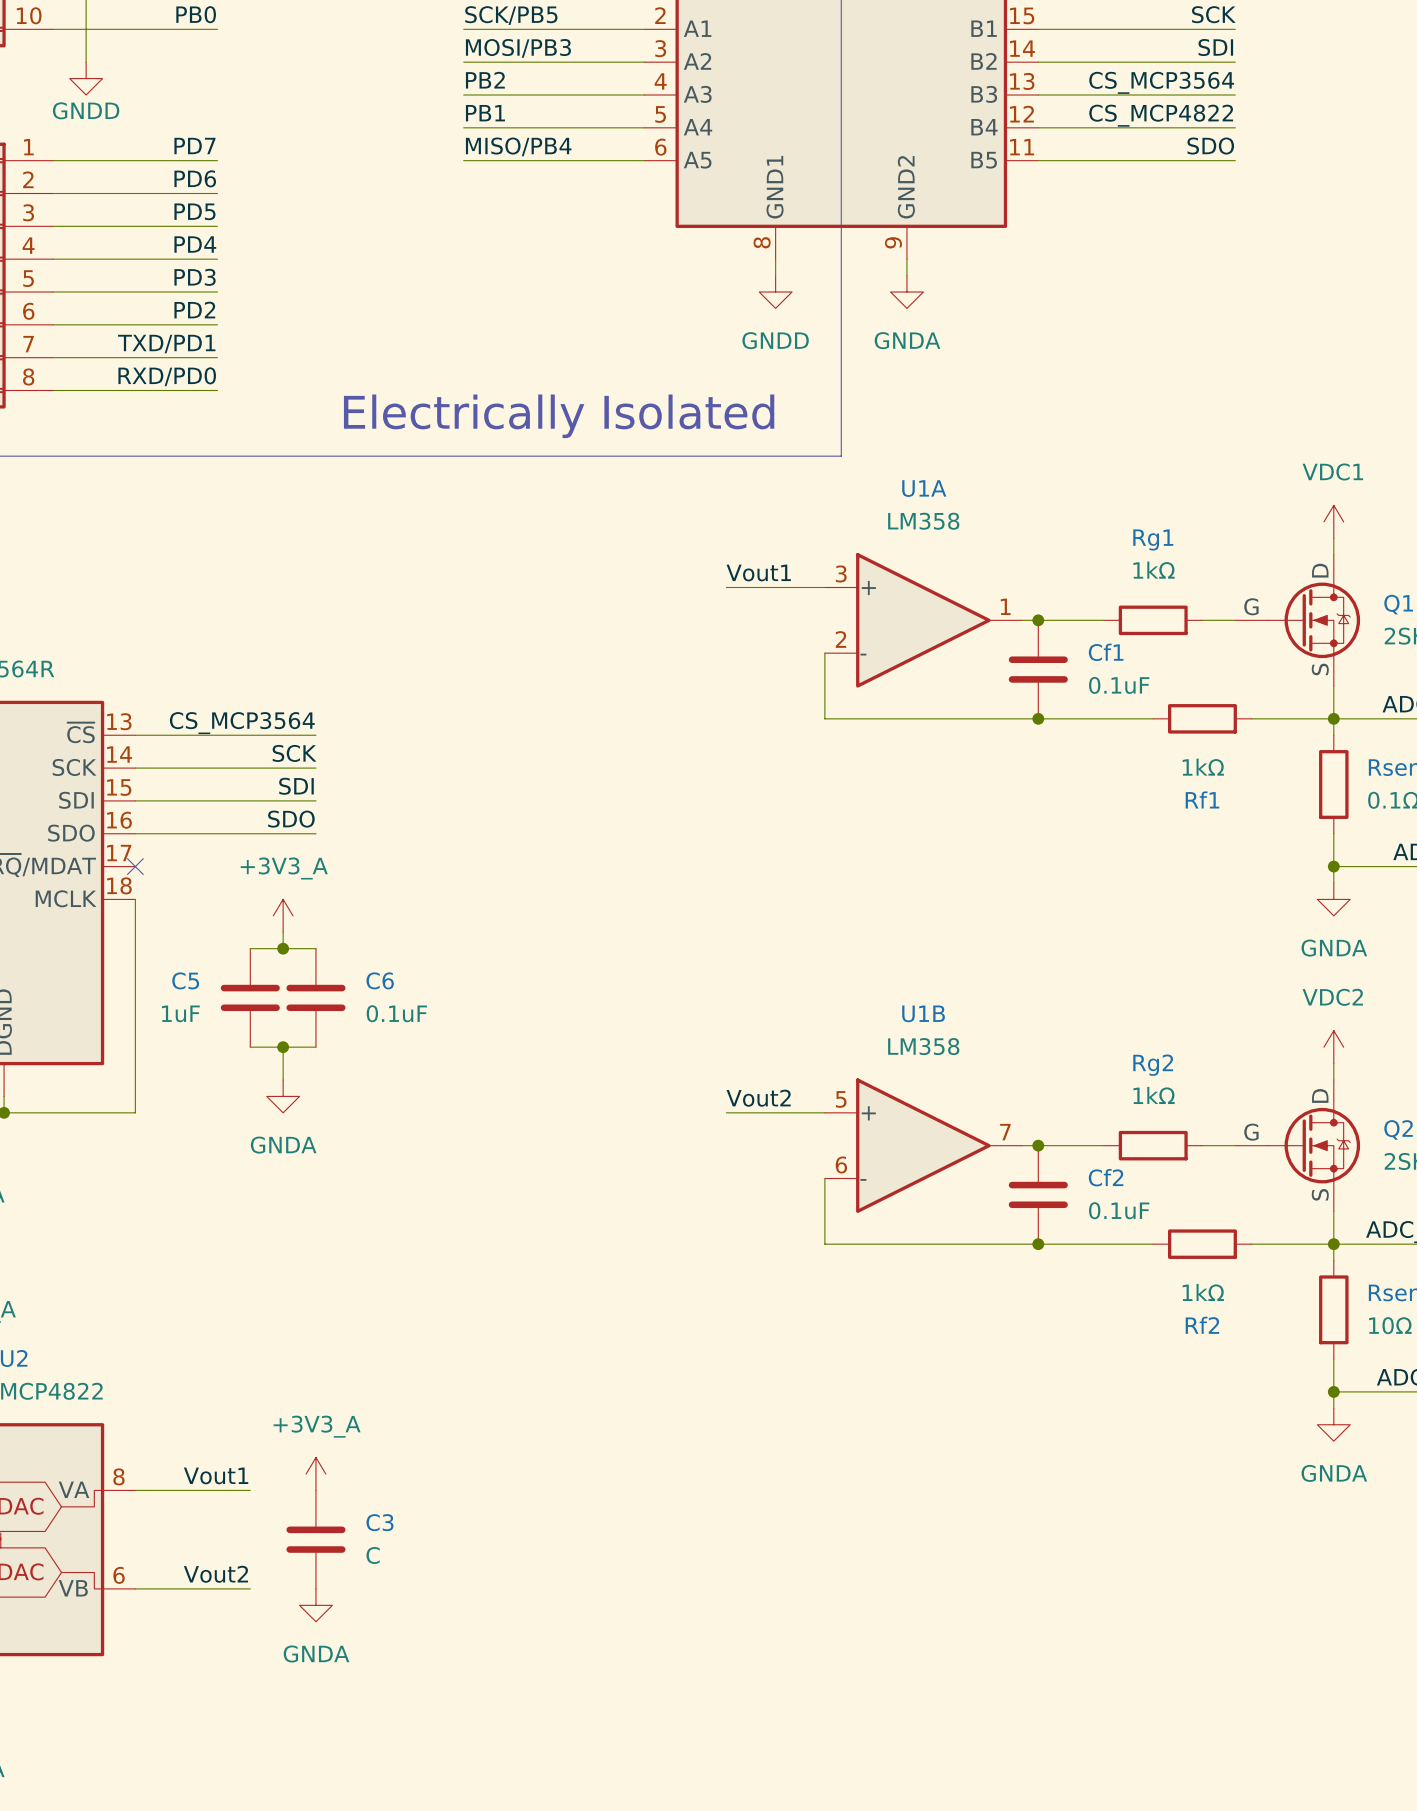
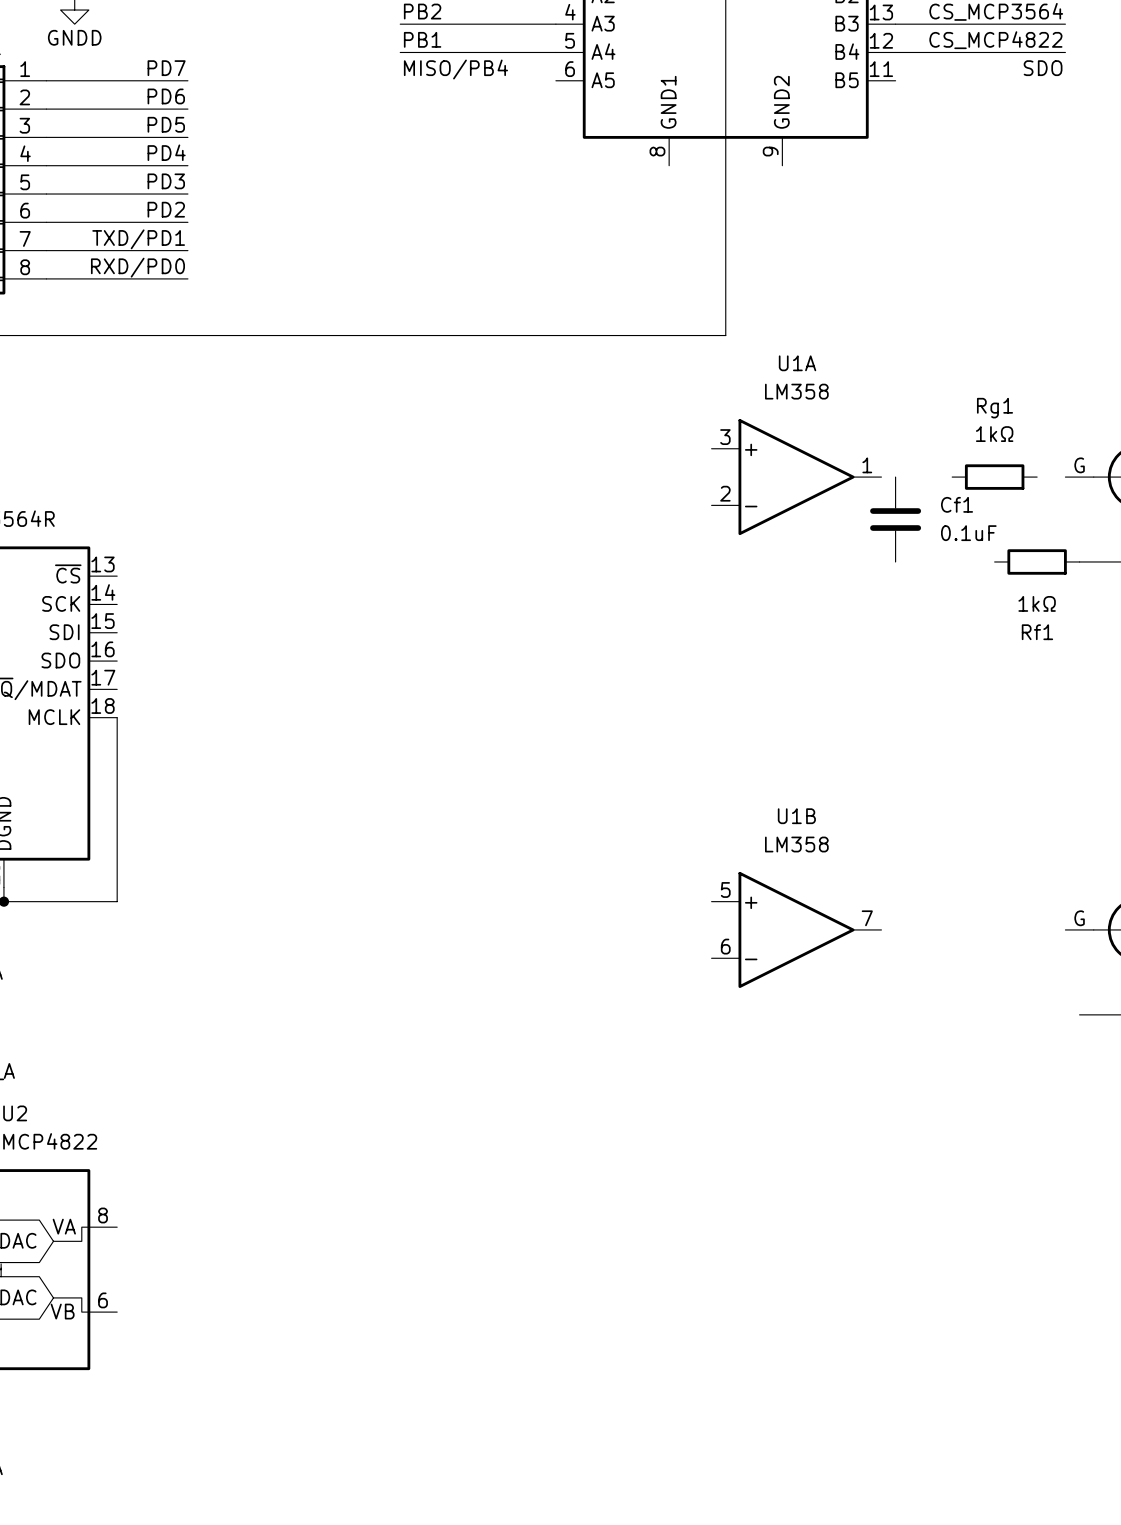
wire: (463, 160) (644, 160) -> none
wire: (1038, 160) (1235, 160) -> none
wire: (775, 259) (775, 275) -> none
wire: (906, 259) (906, 275) -> none
power symbol: GNDD (775, 292) -> none
power symbol: GNDA (906, 292) -> none
text: Electrically Isolated (559, 416) -> none
label: Vout1 (758, 573) -> none
wire: (726, 587) (824, 587) -> none
wire: (1021, 620) (1103, 620) -> none
junction: (1038, 620) -> none
wire: (1202, 620) (1235, 620) -> none
wire: (824, 653) (824, 718) (1153, 718) -> none
junction: (1038, 718) -> none
label: CS_MCP3564 (242, 723) -> none
wire: (135, 735) (315, 735) -> none
label: SCK (294, 753) -> none
wire: (135, 768) (315, 768) -> none
label: SDI (296, 786) -> none
wire: (135, 800) (315, 800) -> none
label: SDO (291, 819) -> none
wire: (135, 833) (315, 833) -> none
no-connect mark: (135, 866) -> none
power symbol: +3V3_A (283, 915) -> none
wire: (283, 932) (283, 948) -> none
wire: (250, 948) (315, 948) -> none
junction: (283, 948) -> none
C5: 1uF (250, 997) -> none
C6: 0.1uF (315, 997) -> none
wire: (250, 1047) (315, 1047) -> none
wire: (283, 1047) (283, 1080) -> none
junction: (283, 1047) -> none
power symbol: GNDA (283, 1096) -> none
label: Vout2 (758, 1098) -> none
wire: (726, 1112) (824, 1112) -> none
wire: (1021, 1145) (1103, 1145) -> none
junction: (1038, 1145) -> none
Rg2: 1kΩ (1153, 1145) -> none
wire: (1202, 1145) (1235, 1145) -> none
wire: (824, 1178) (824, 1244) (1153, 1244) -> none
Cf2: 0.1uF (1038, 1194) -> none
junction: (1038, 1244) -> none
Rf2: 1kΩ (1202, 1244) -> none
power symbol: +3V3_A (315, 1474) -> none
label: Vout1 (216, 1475) -> none
wire: (135, 1490) (250, 1490) -> none
C3: C (315, 1539) -> none
label: Vout2 (215, 1574) -> none
wire: (135, 1588) (250, 1588) -> none
power symbol: GNDA (315, 1605) -> none

